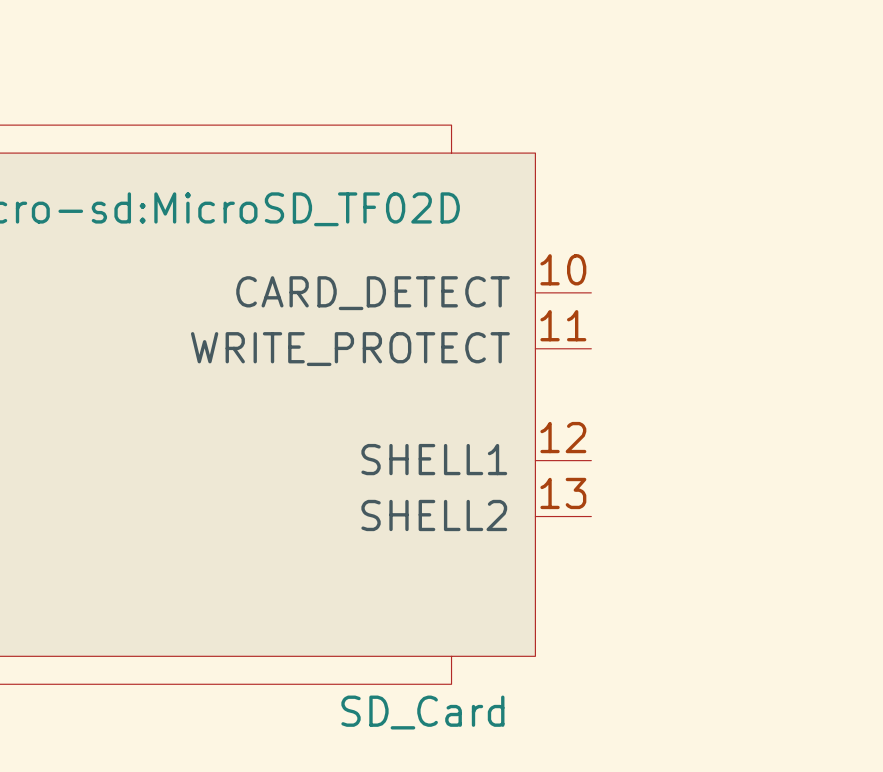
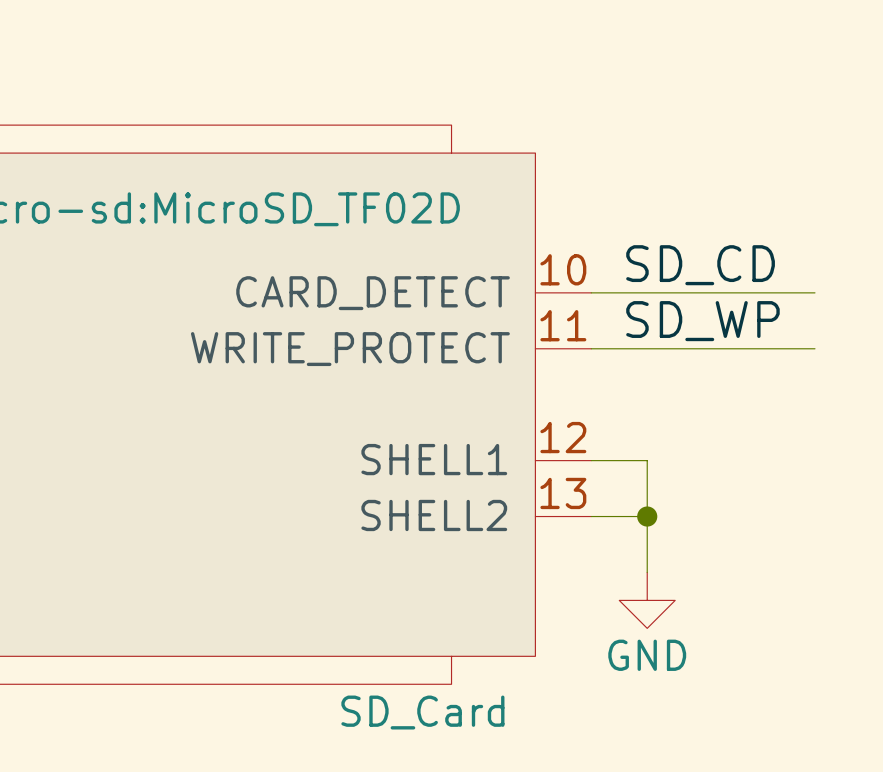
label: none -> SD_CD (700, 265)
wire: none -> (591, 292) (814, 292)
label: none -> SD_WP (702, 321)
wire: none -> (591, 348) (814, 348)
wire: none -> (591, 460) (647, 460) (647, 572)
wire: none -> (591, 516) (647, 516)
junction: none -> (647, 516)
power symbol: none -> GND (647, 600)

